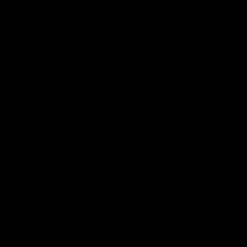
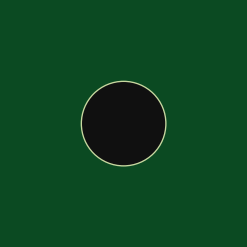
part: none -> (123, 123)

